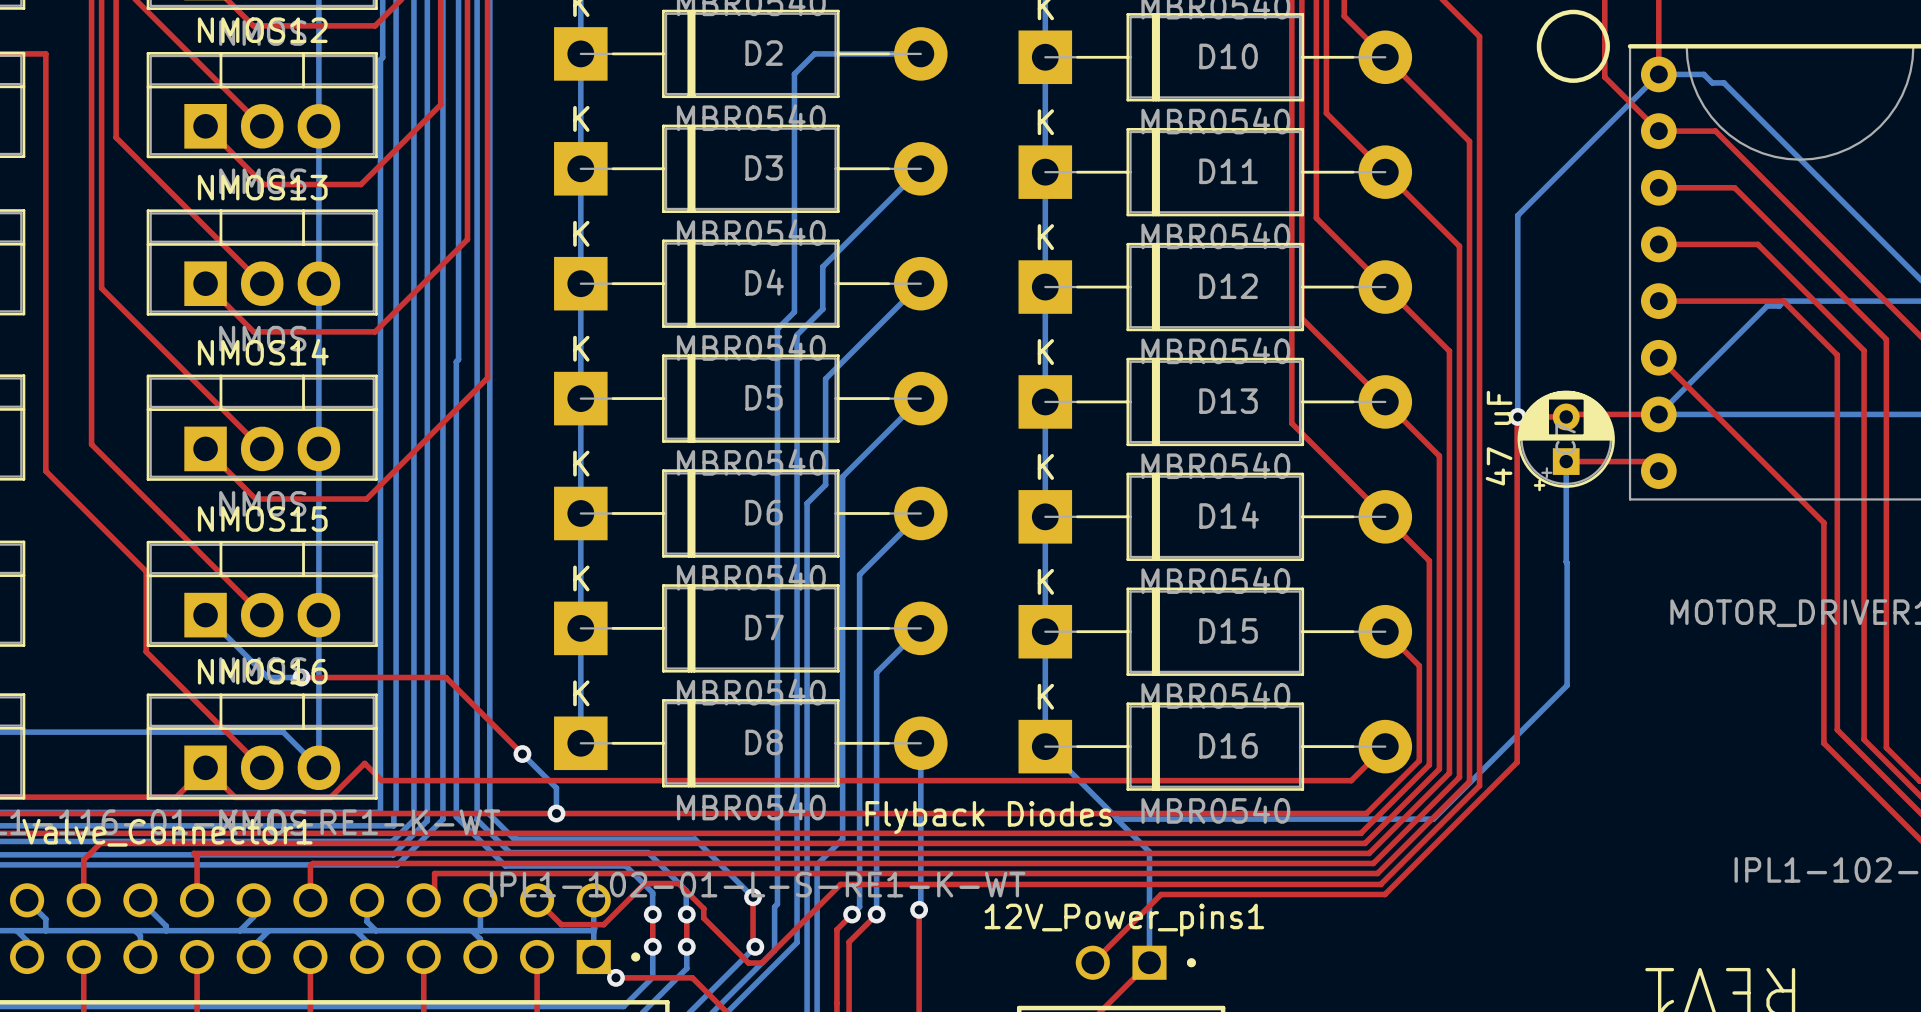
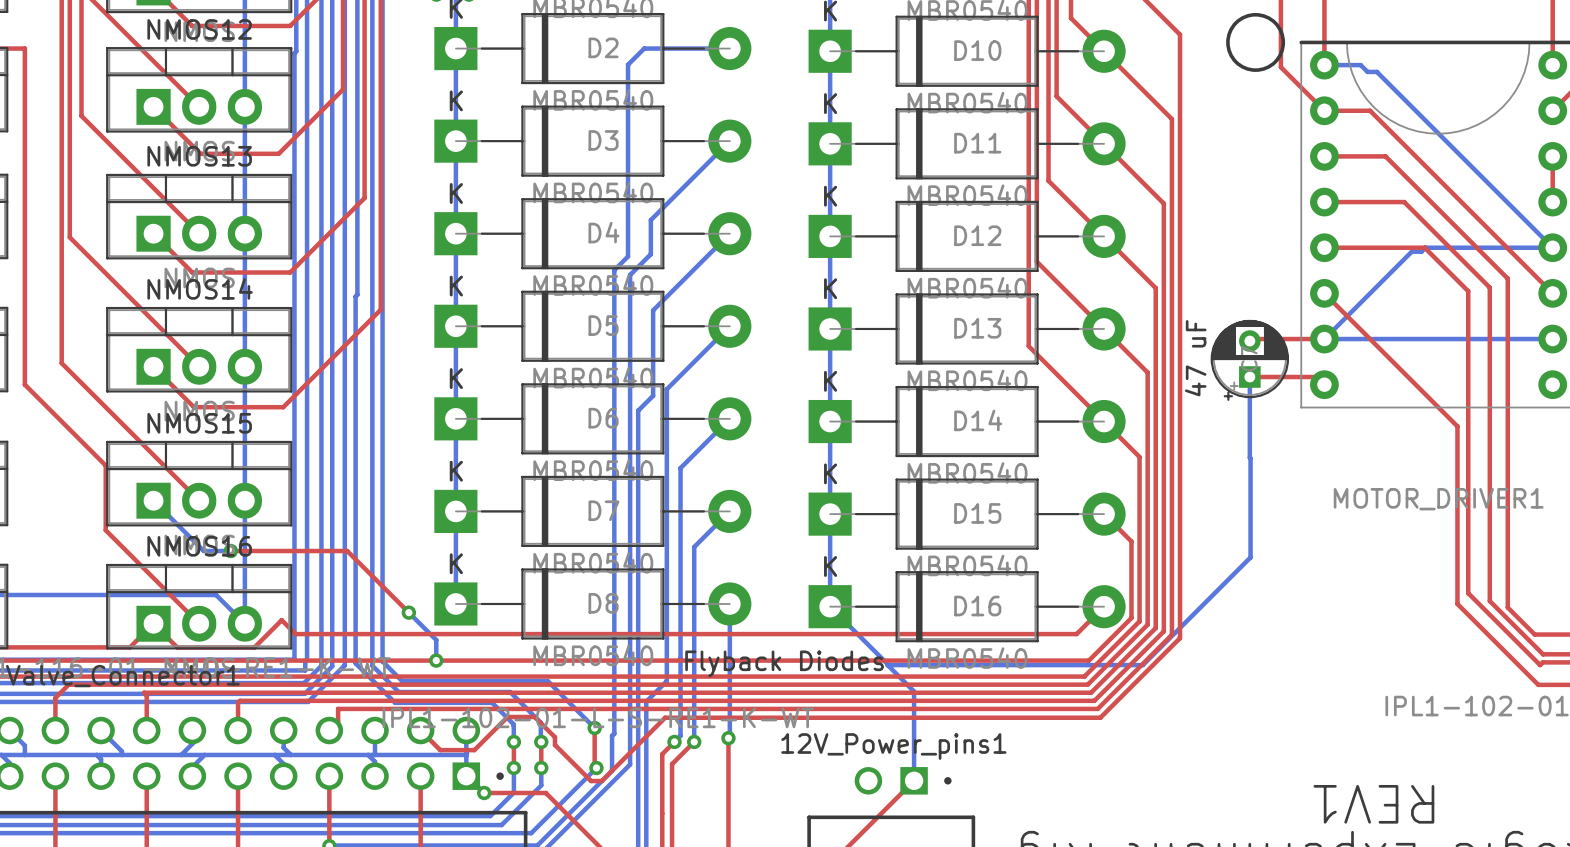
bottom track: (1658, 74) (1517, 215) (1517, 416) -> none
via: (1517, 416) -> none
top track: (1566, 416) (1517, 417) (1517, 762) (1384, 894) (1161, 894) (1092, 962) -> none

